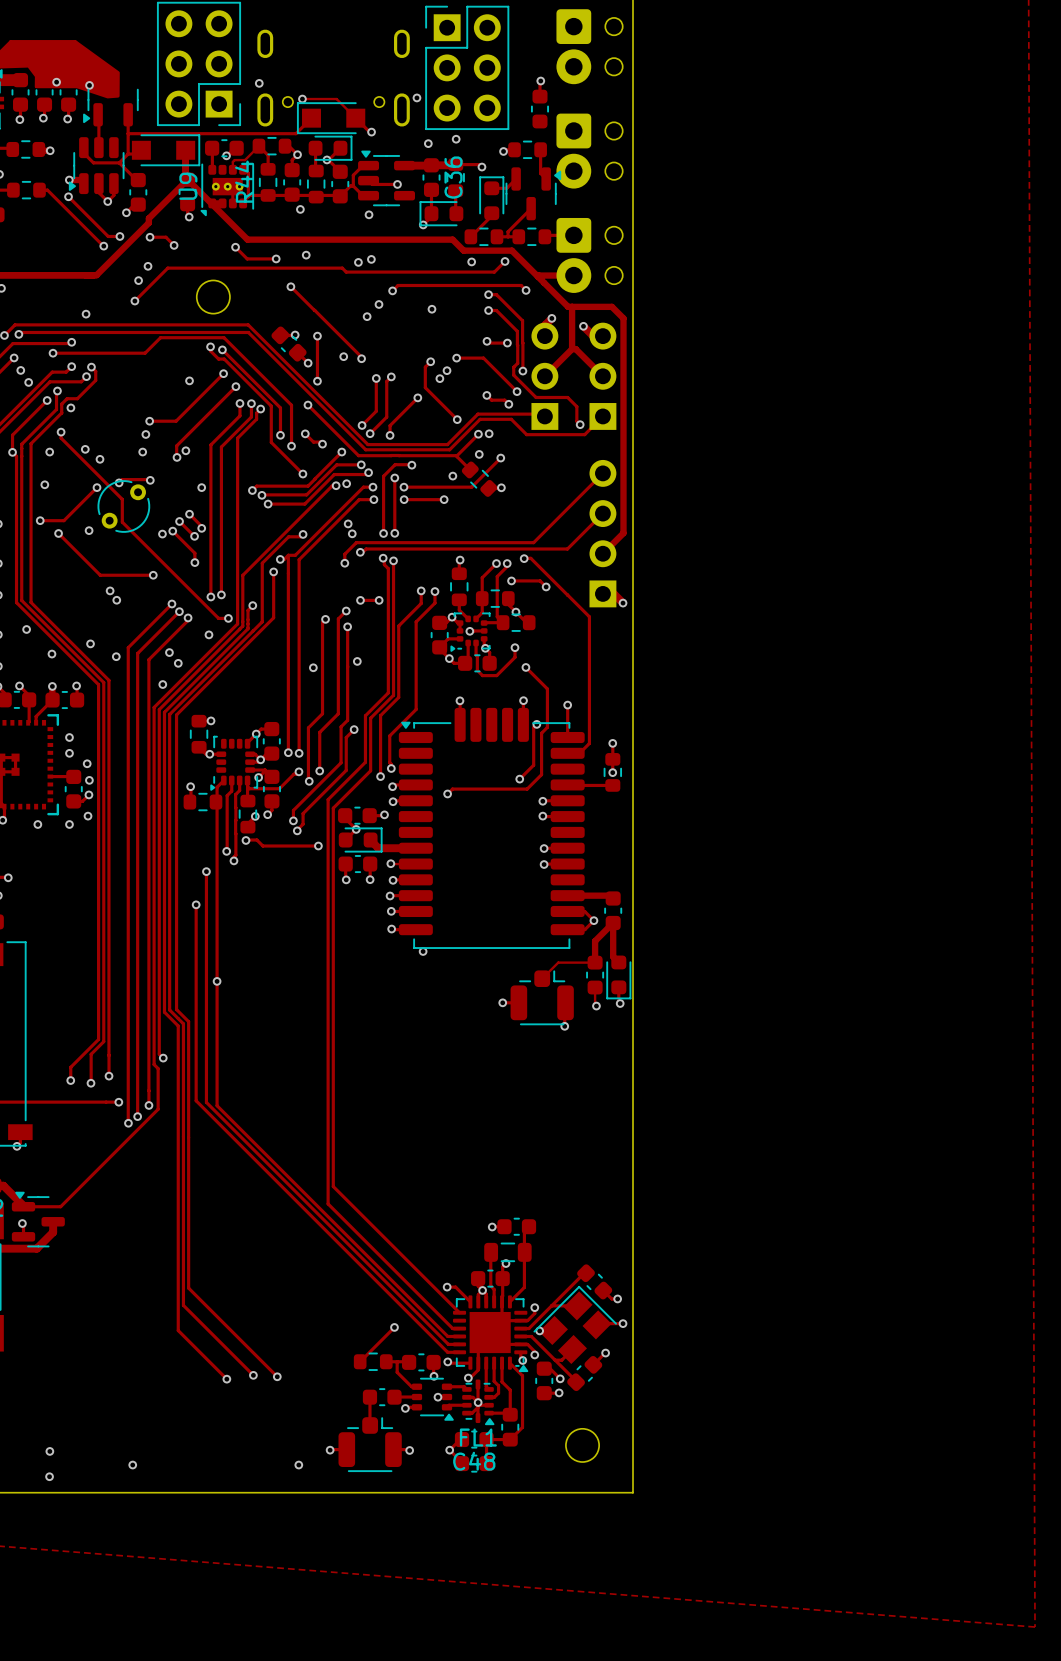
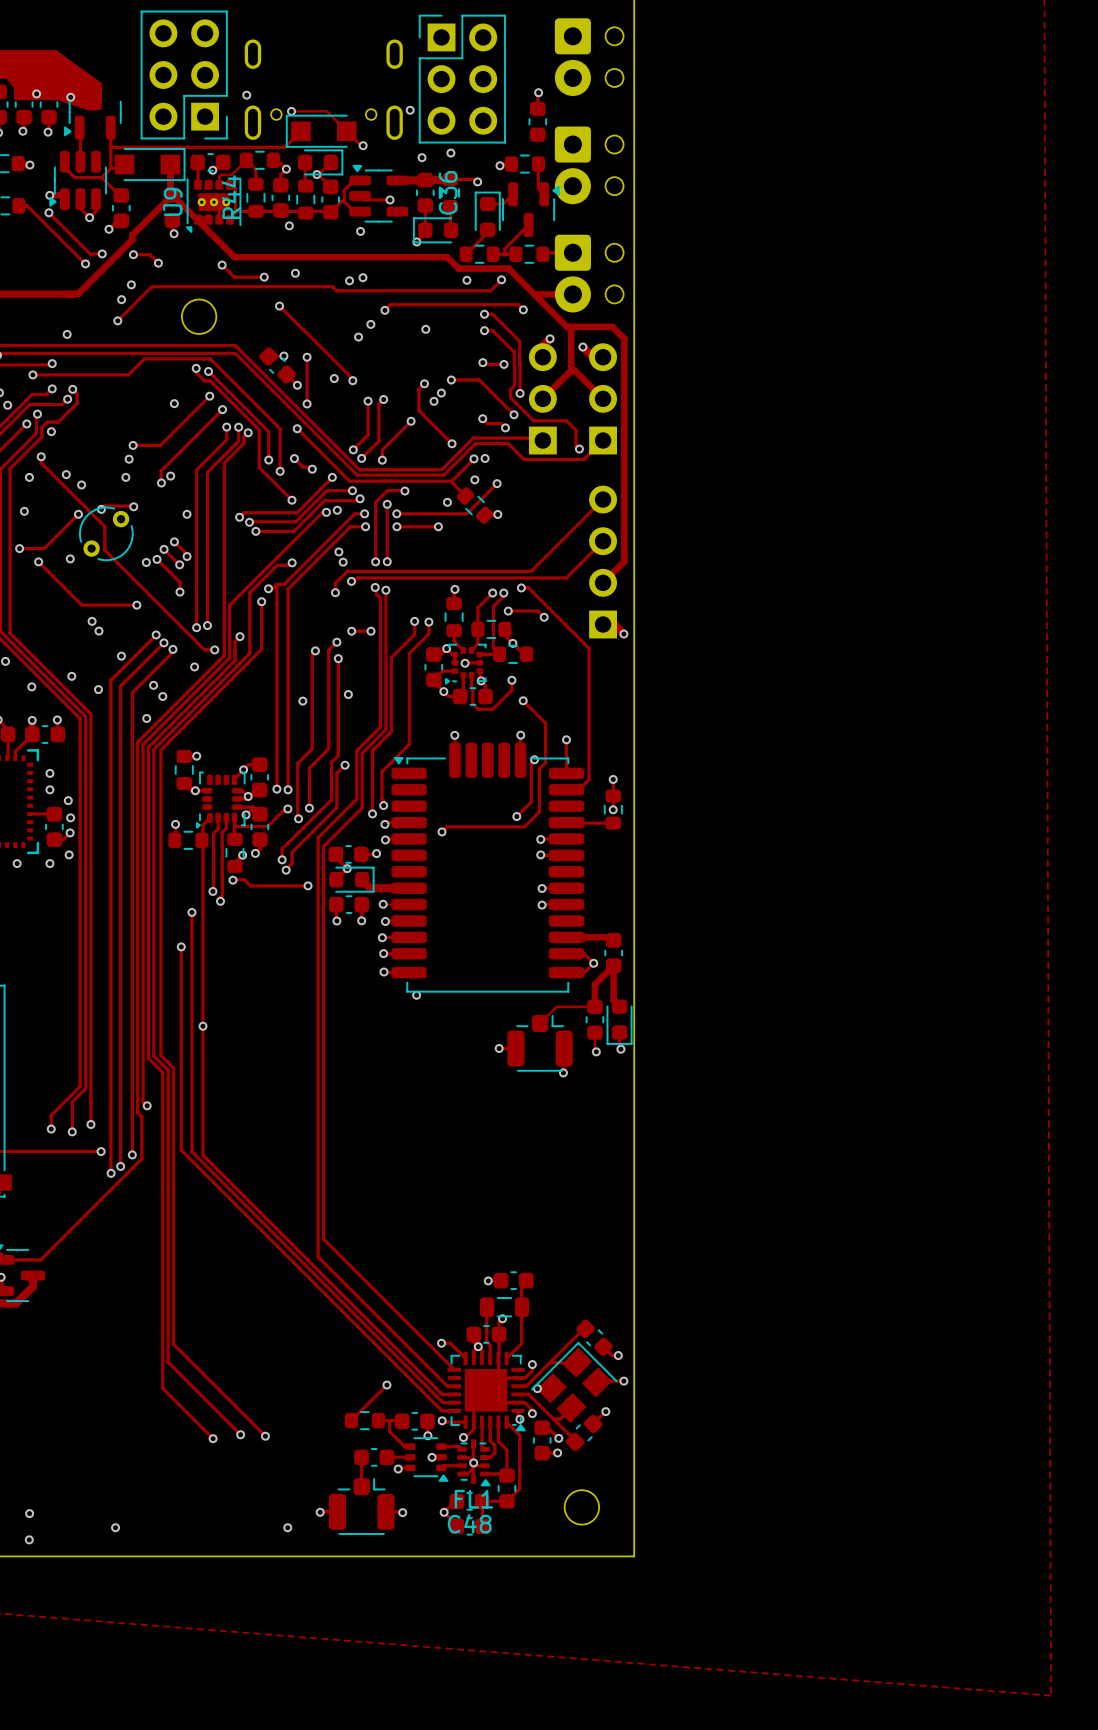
via: none -> (121, 656)

